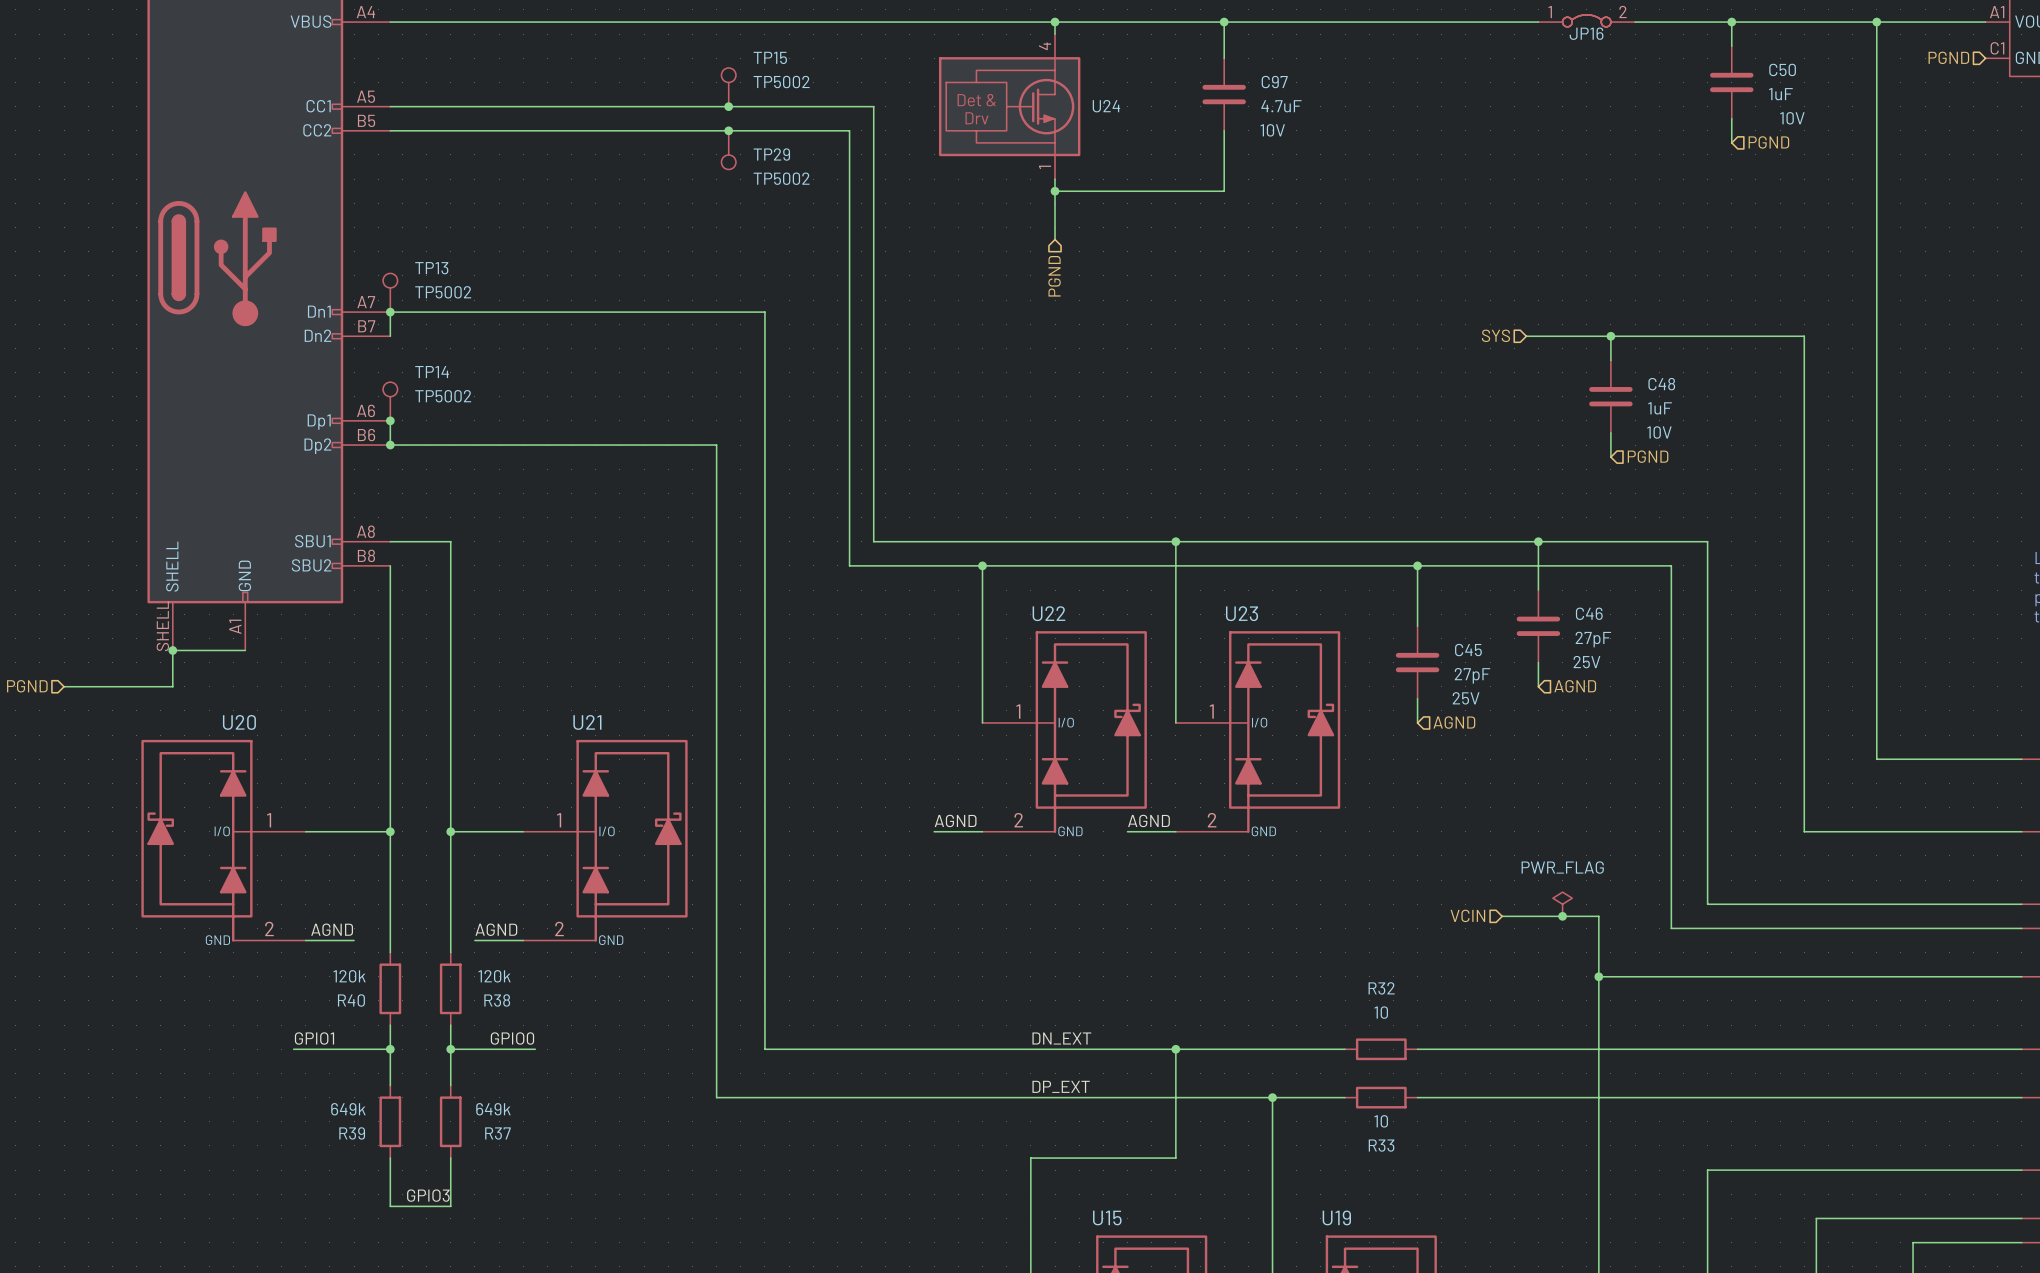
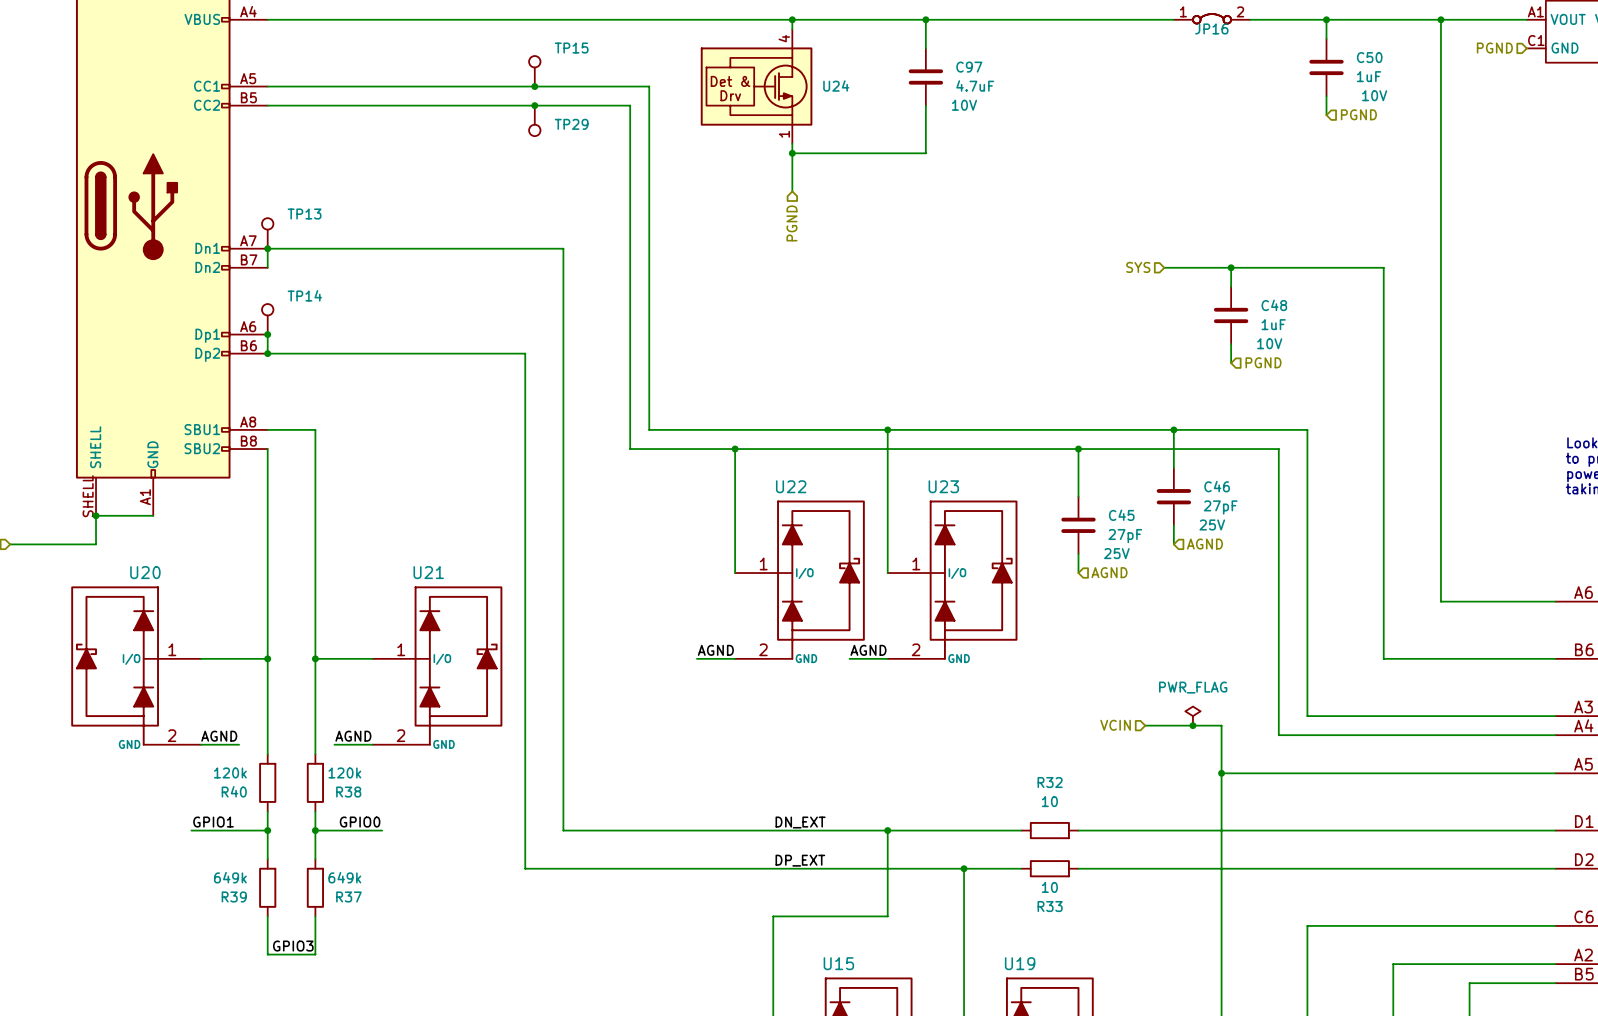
TP15 value: TP5002 (781, 82) -> none
TP29 value: TP5002 (781, 178) -> none
TP13 value: TP5002 (443, 292) -> none
TP14 value: TP5002 (443, 396) -> none

